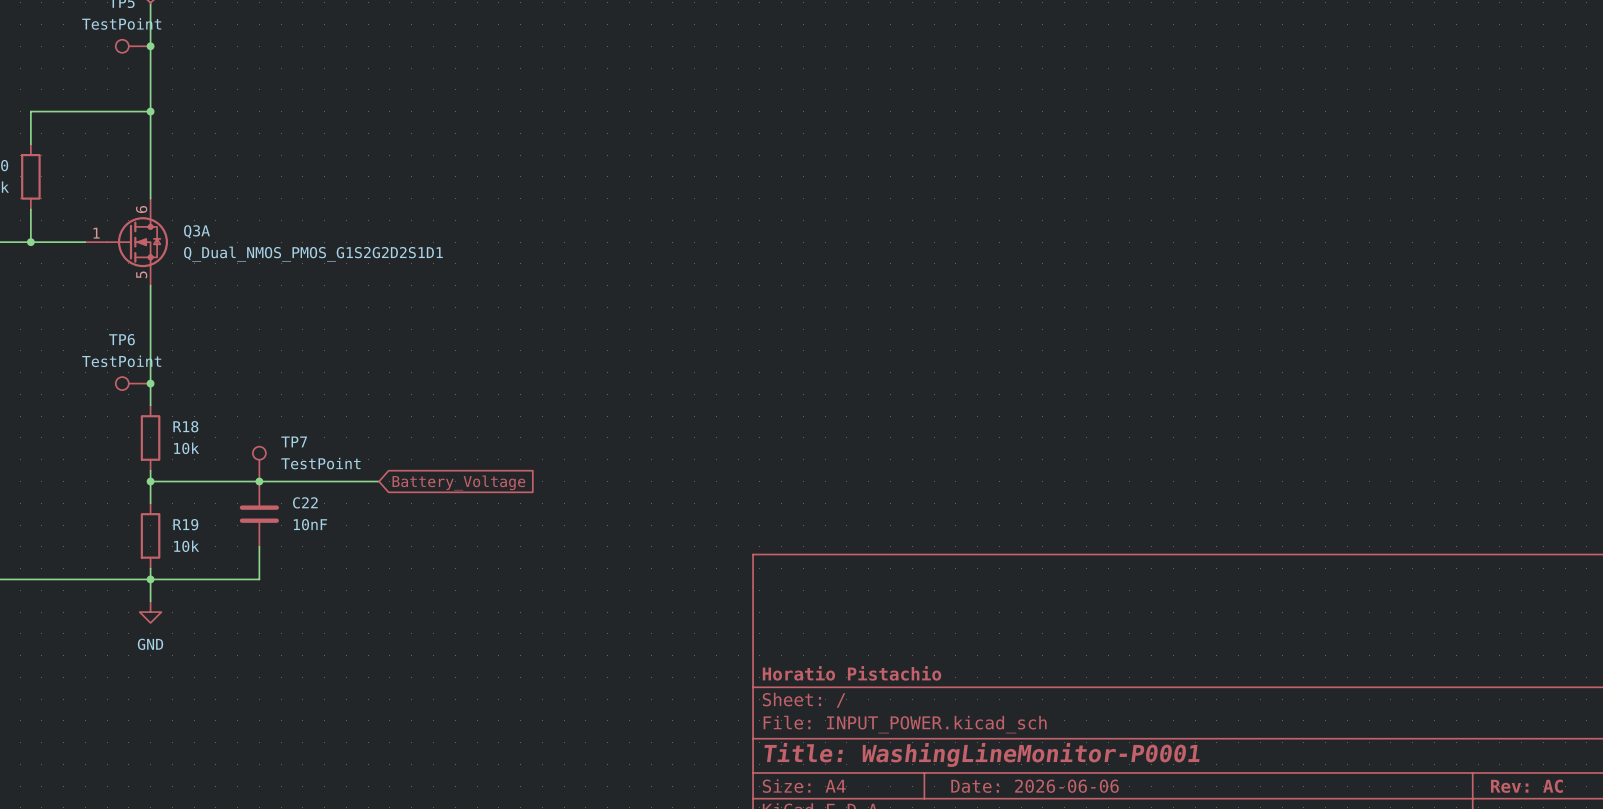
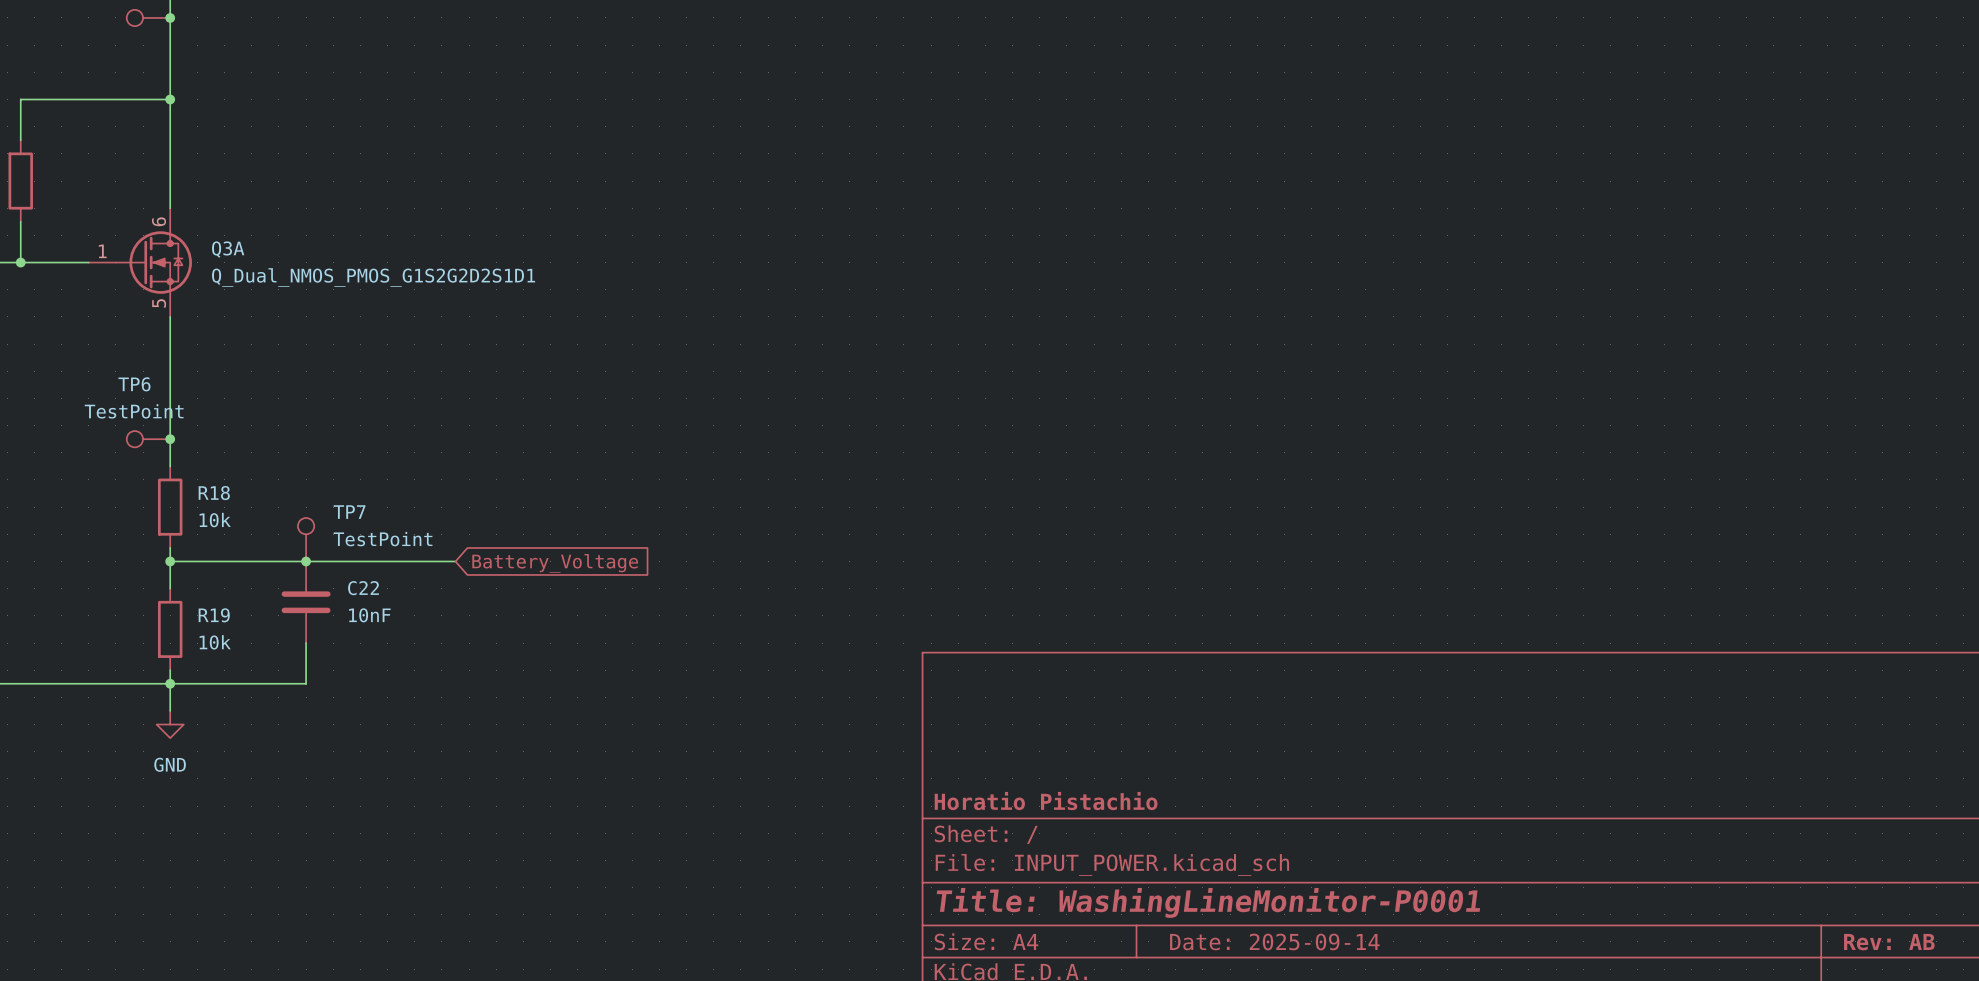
title block: Date: 2026-06-06 (1035, 786) -> Date: 2025-09-14 (1274, 941)
title block: Rev: AC (1526, 786) -> Rev: AB (1889, 942)

